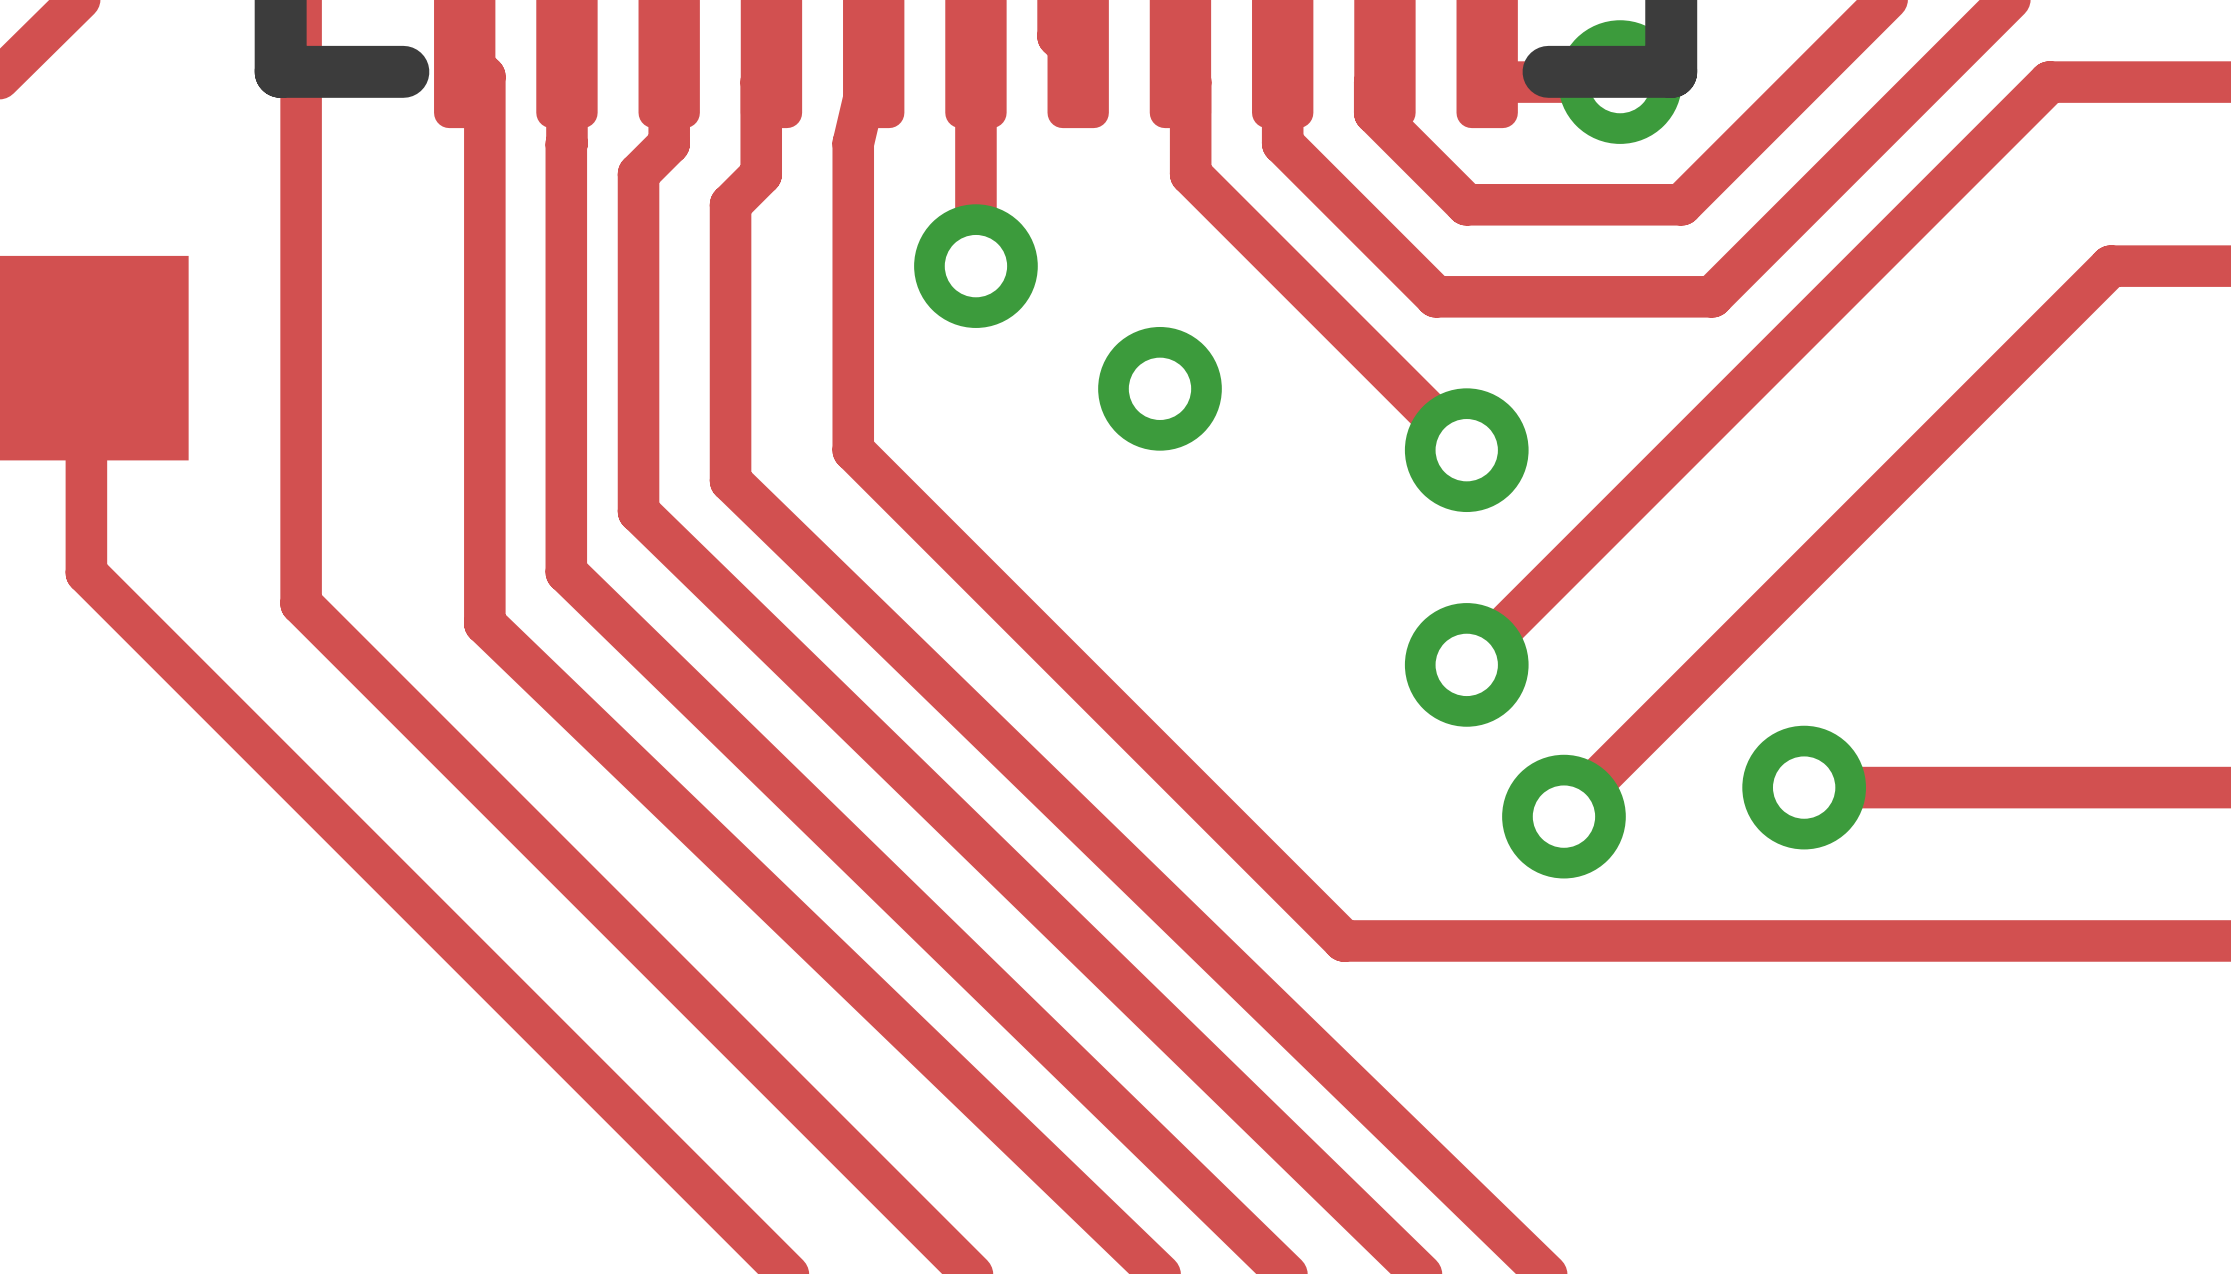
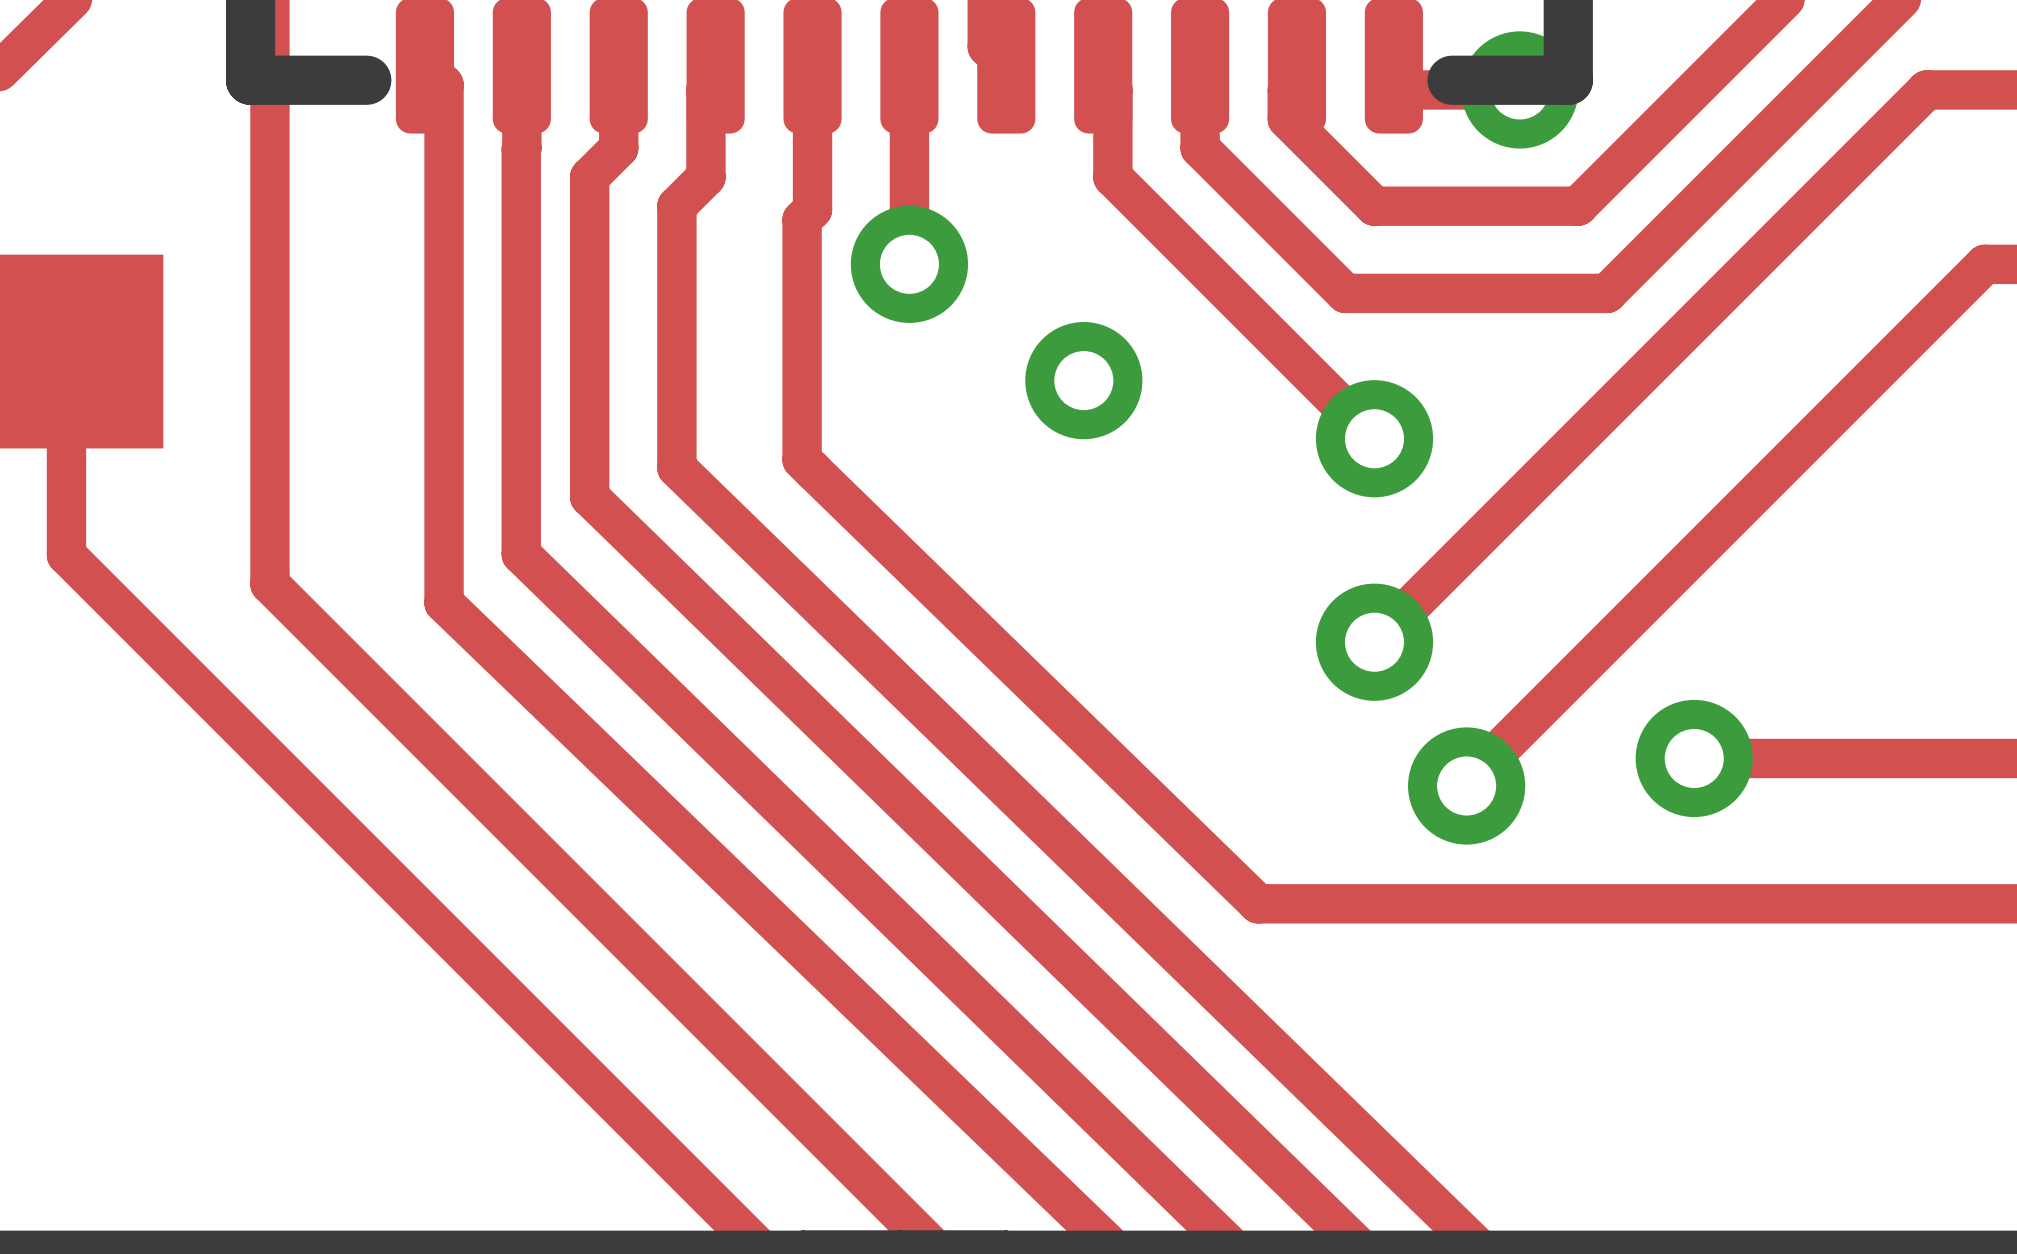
track: (873, 56) (853, 143) (853, 450) (1344, 940) -> (812, 65) (812, 209) (802, 219) (802, 459) (1258, 903)

